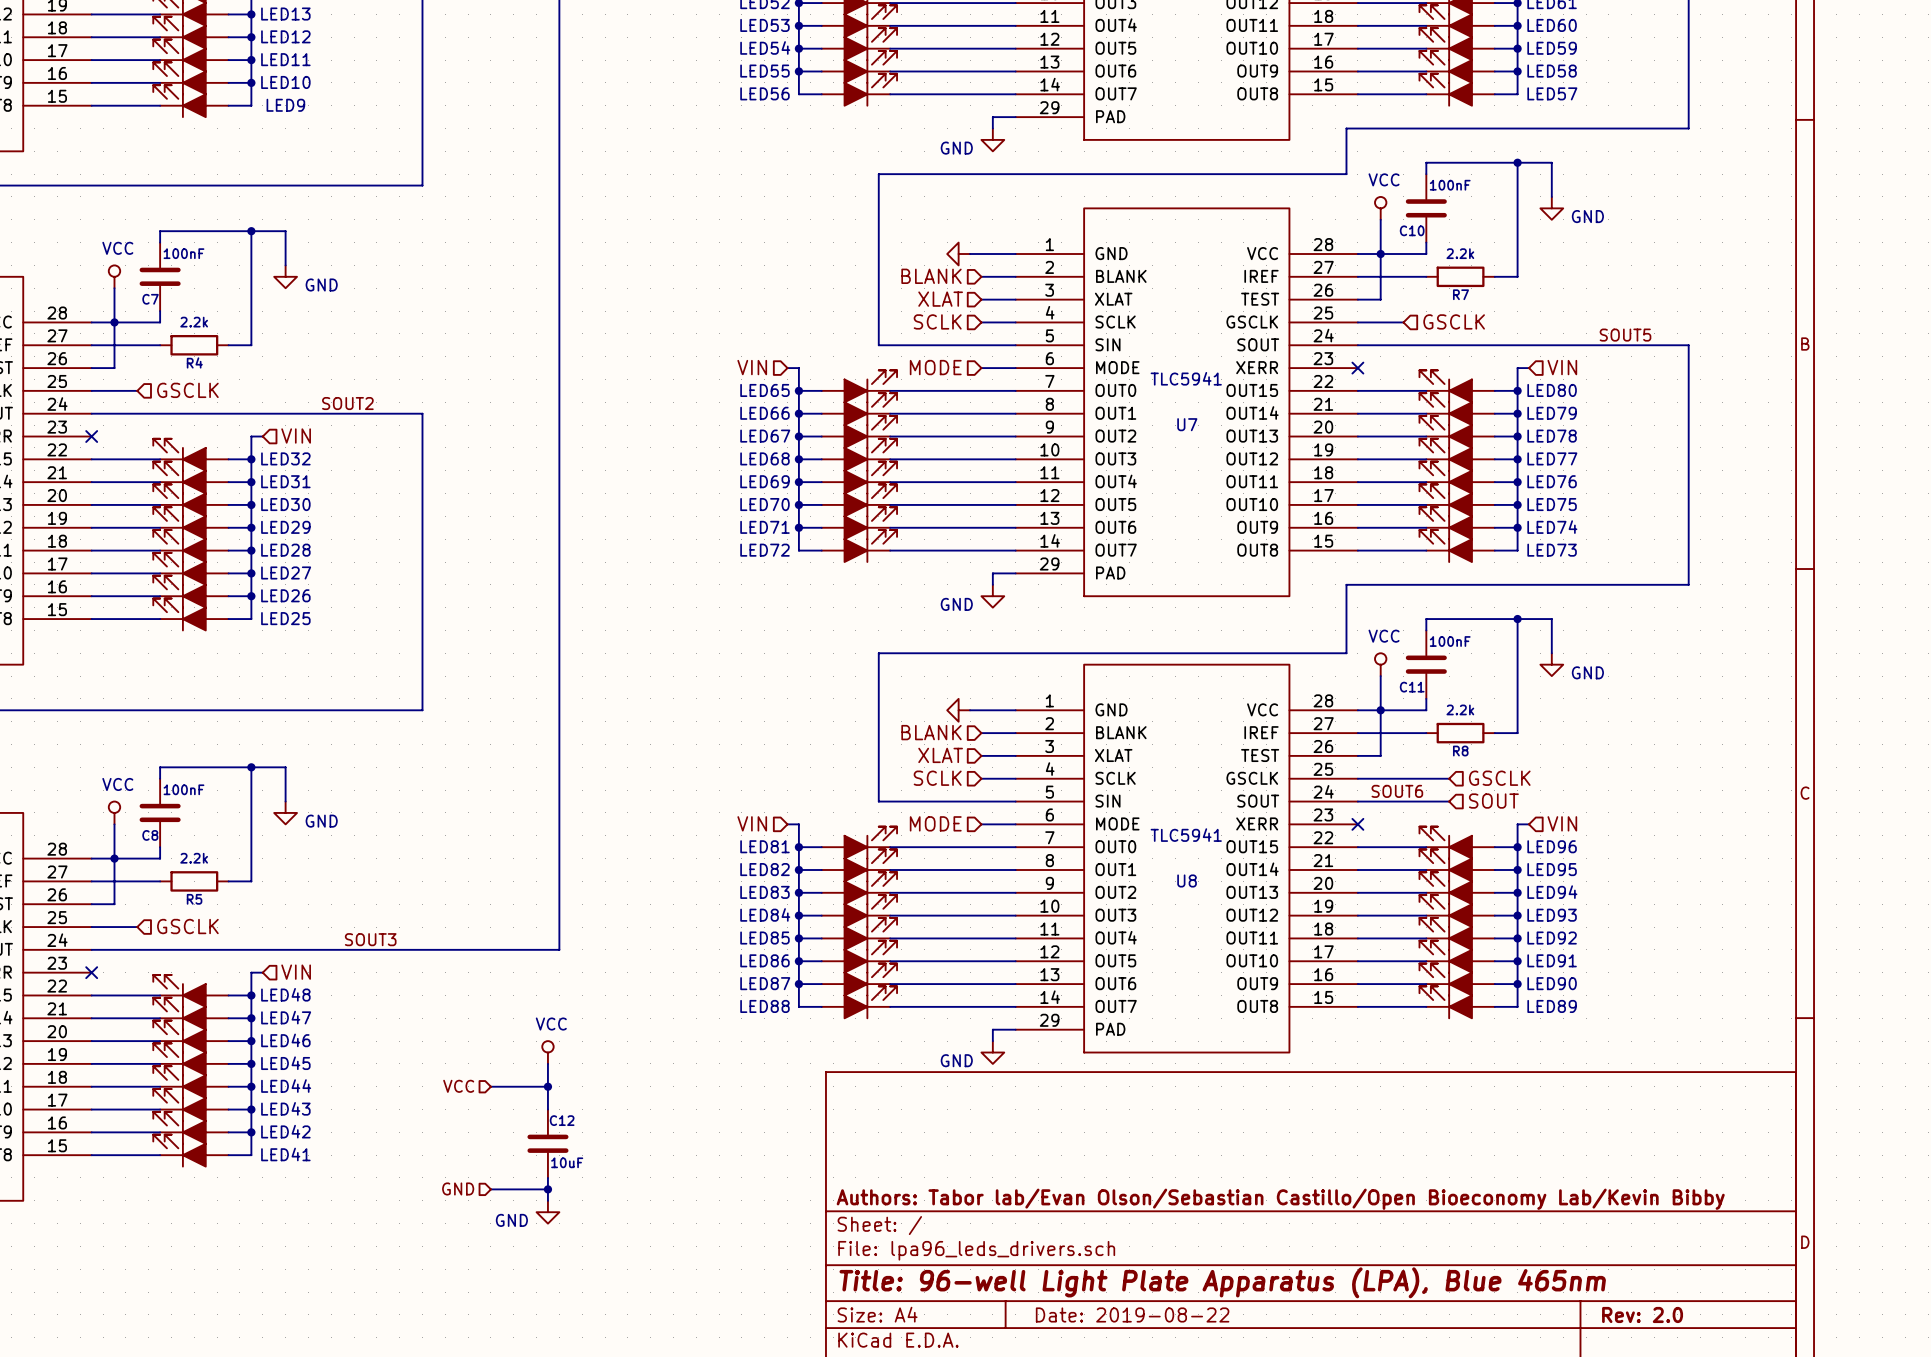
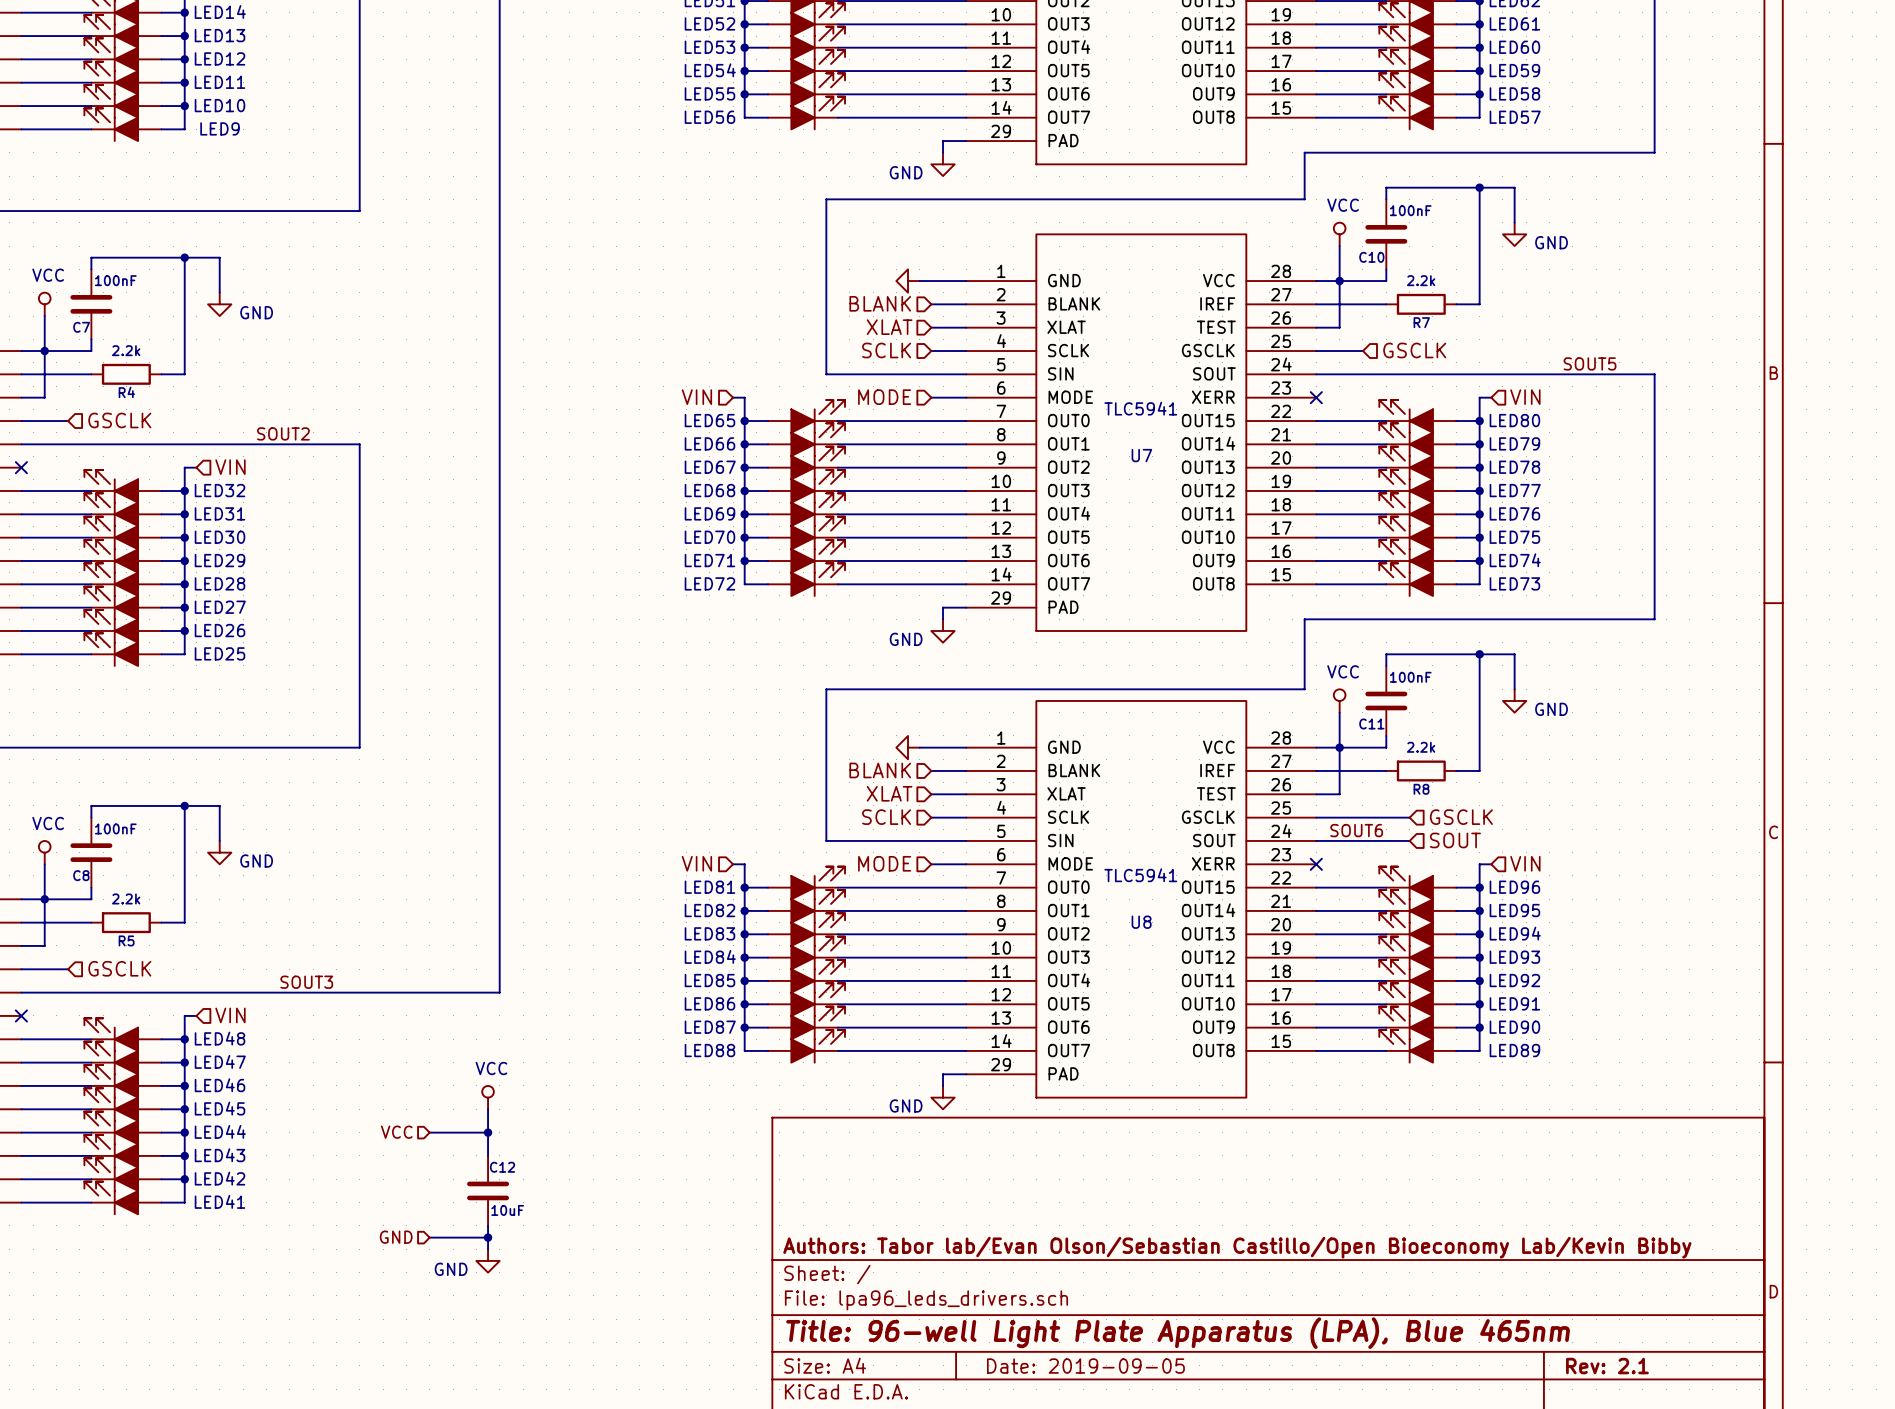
title block: Date: 2019-08-22 (1132, 1314) -> Date: 2019-09-05 (1085, 1366)
title block: Rev: 2.0 (1642, 1314) -> Rev: 2.1 (1607, 1366)

